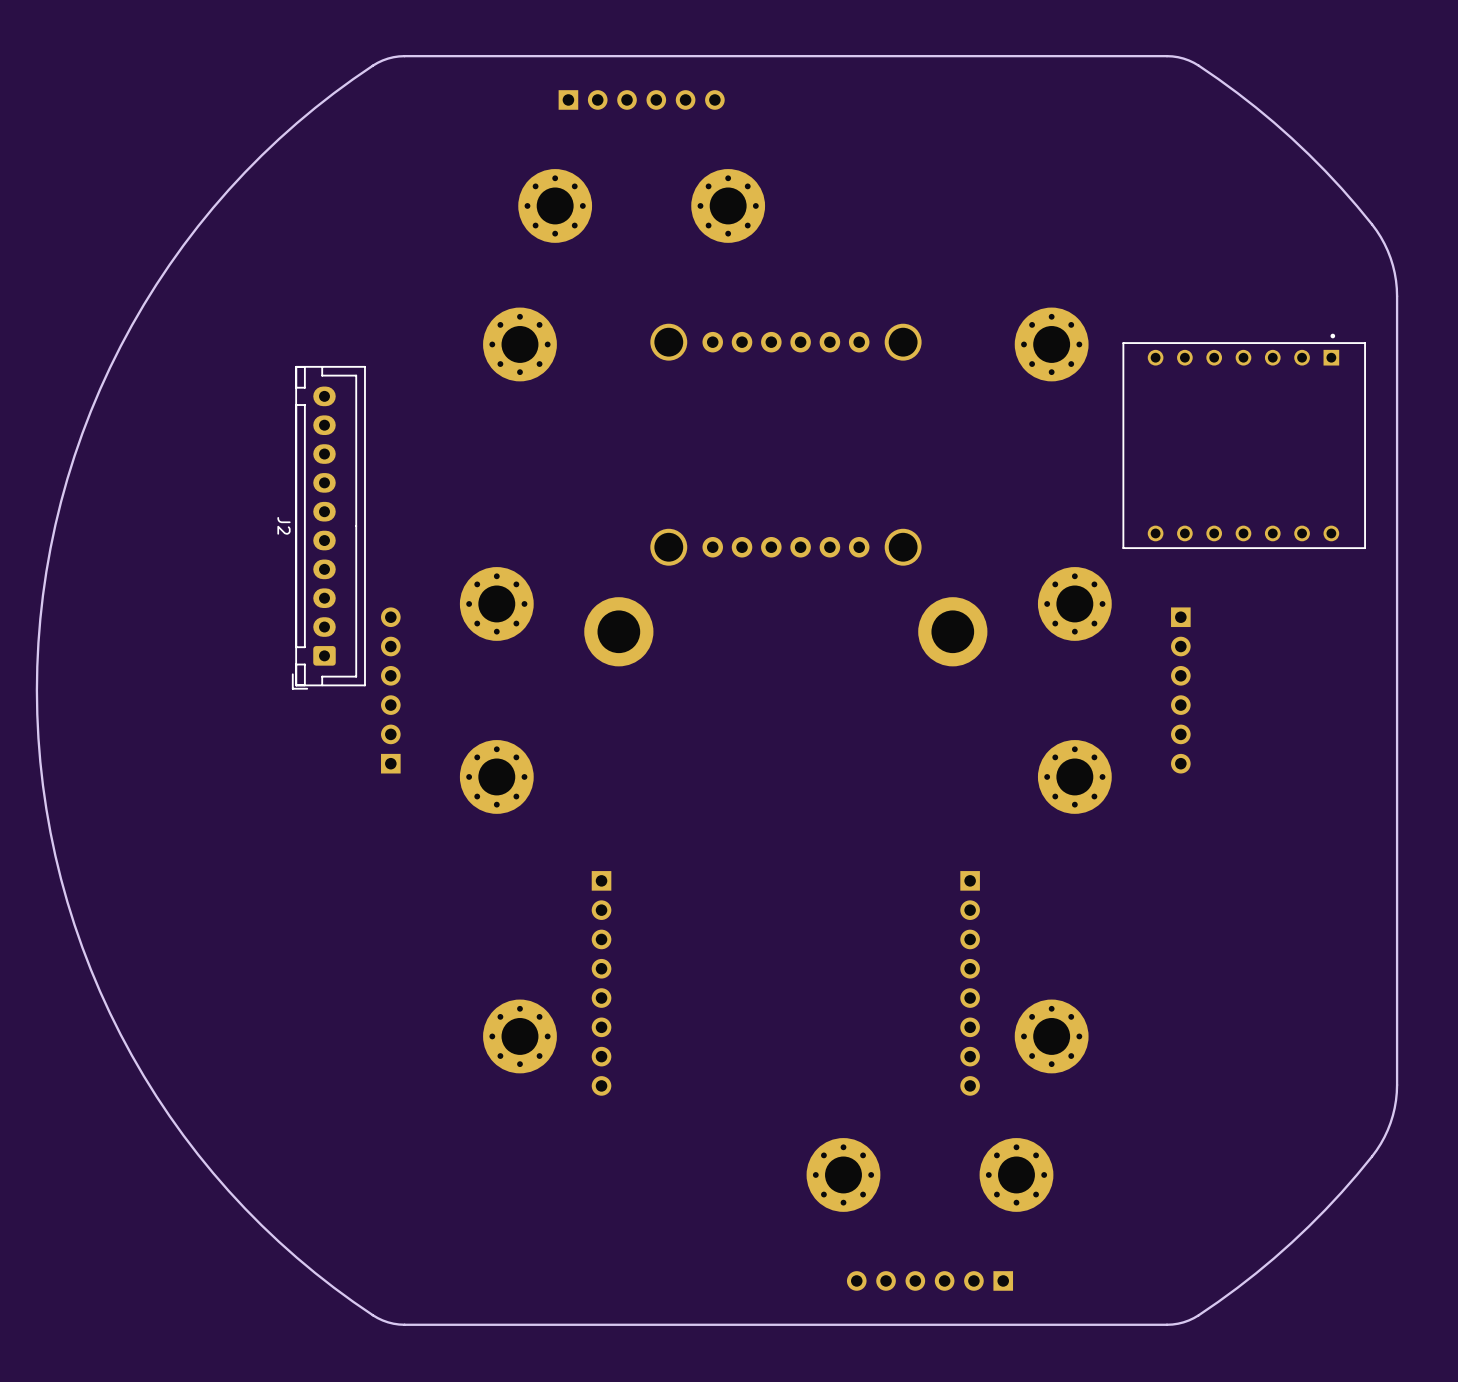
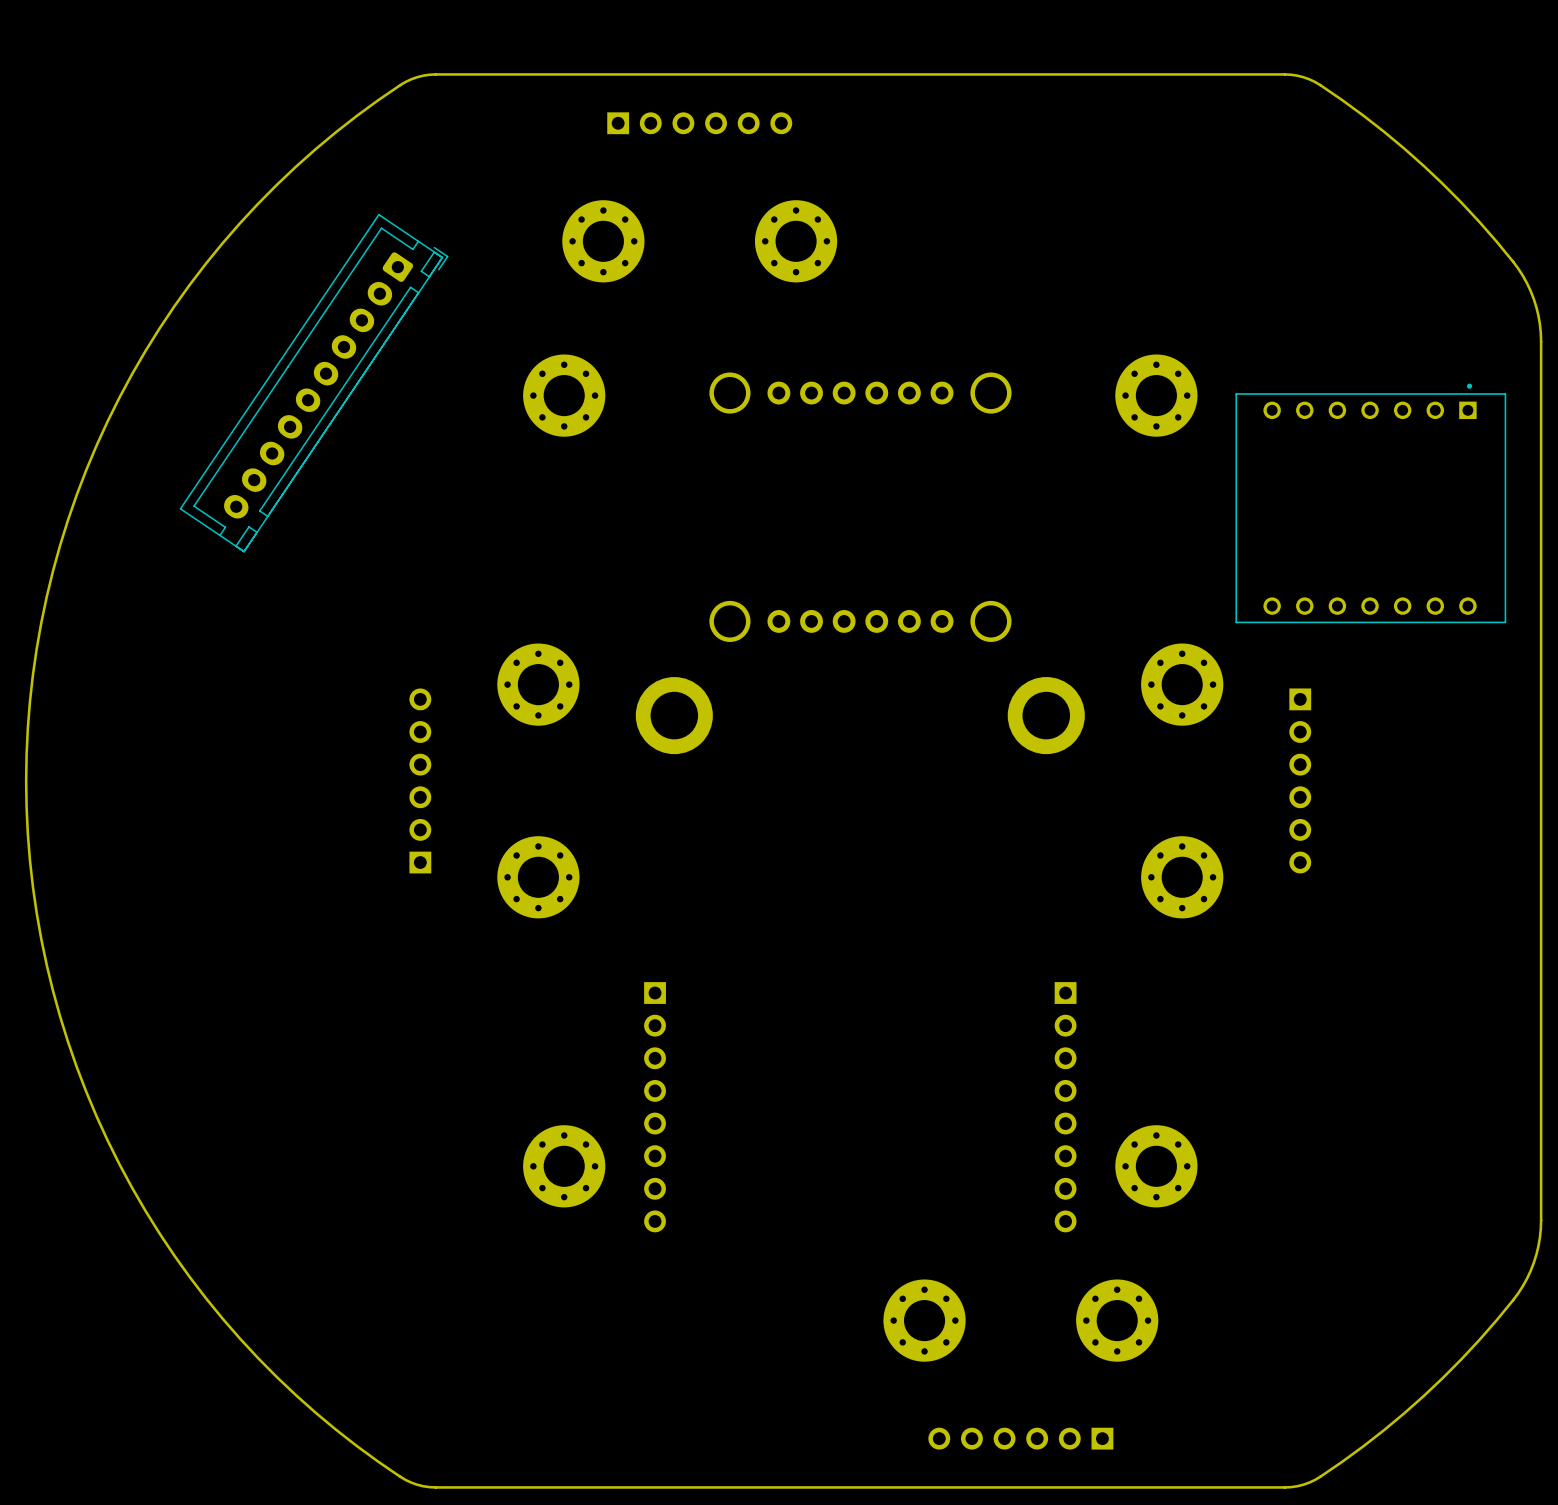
part: none -> (314, 383)
J2: (328, 527) -> none

